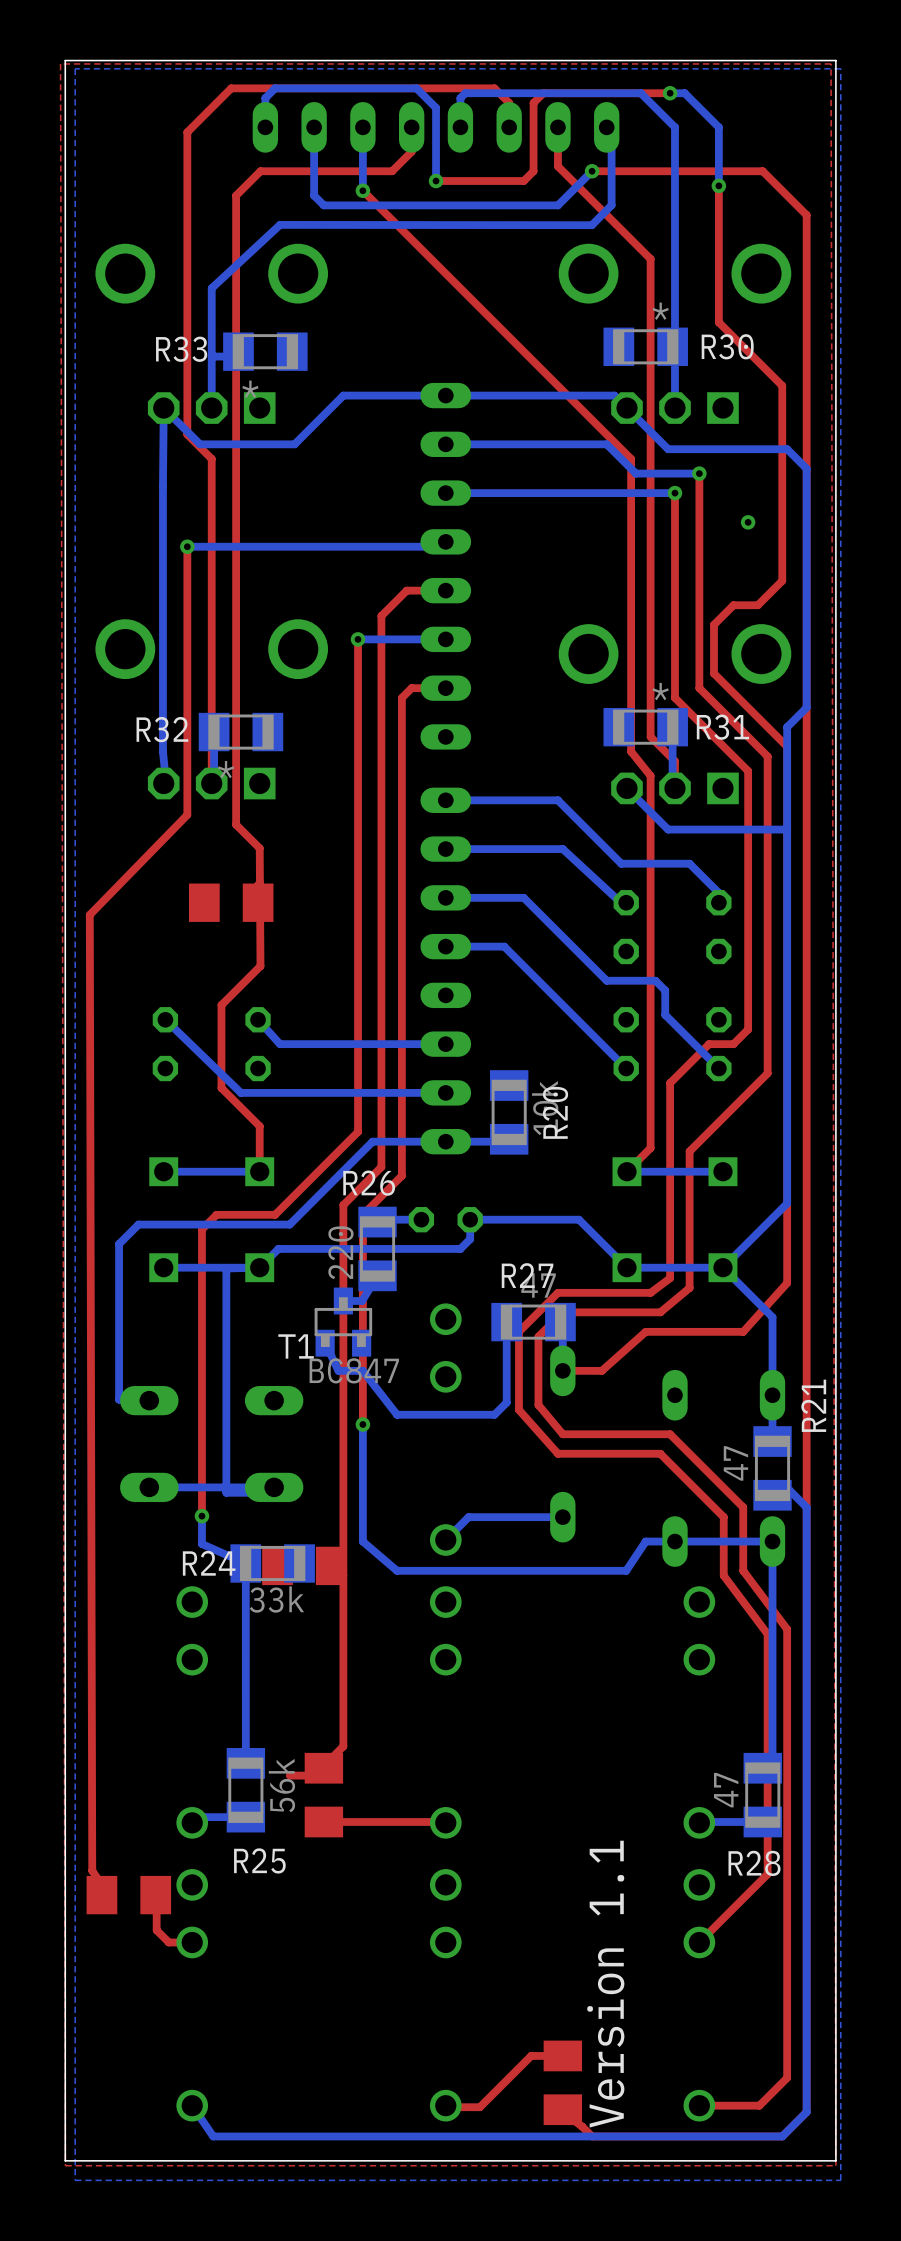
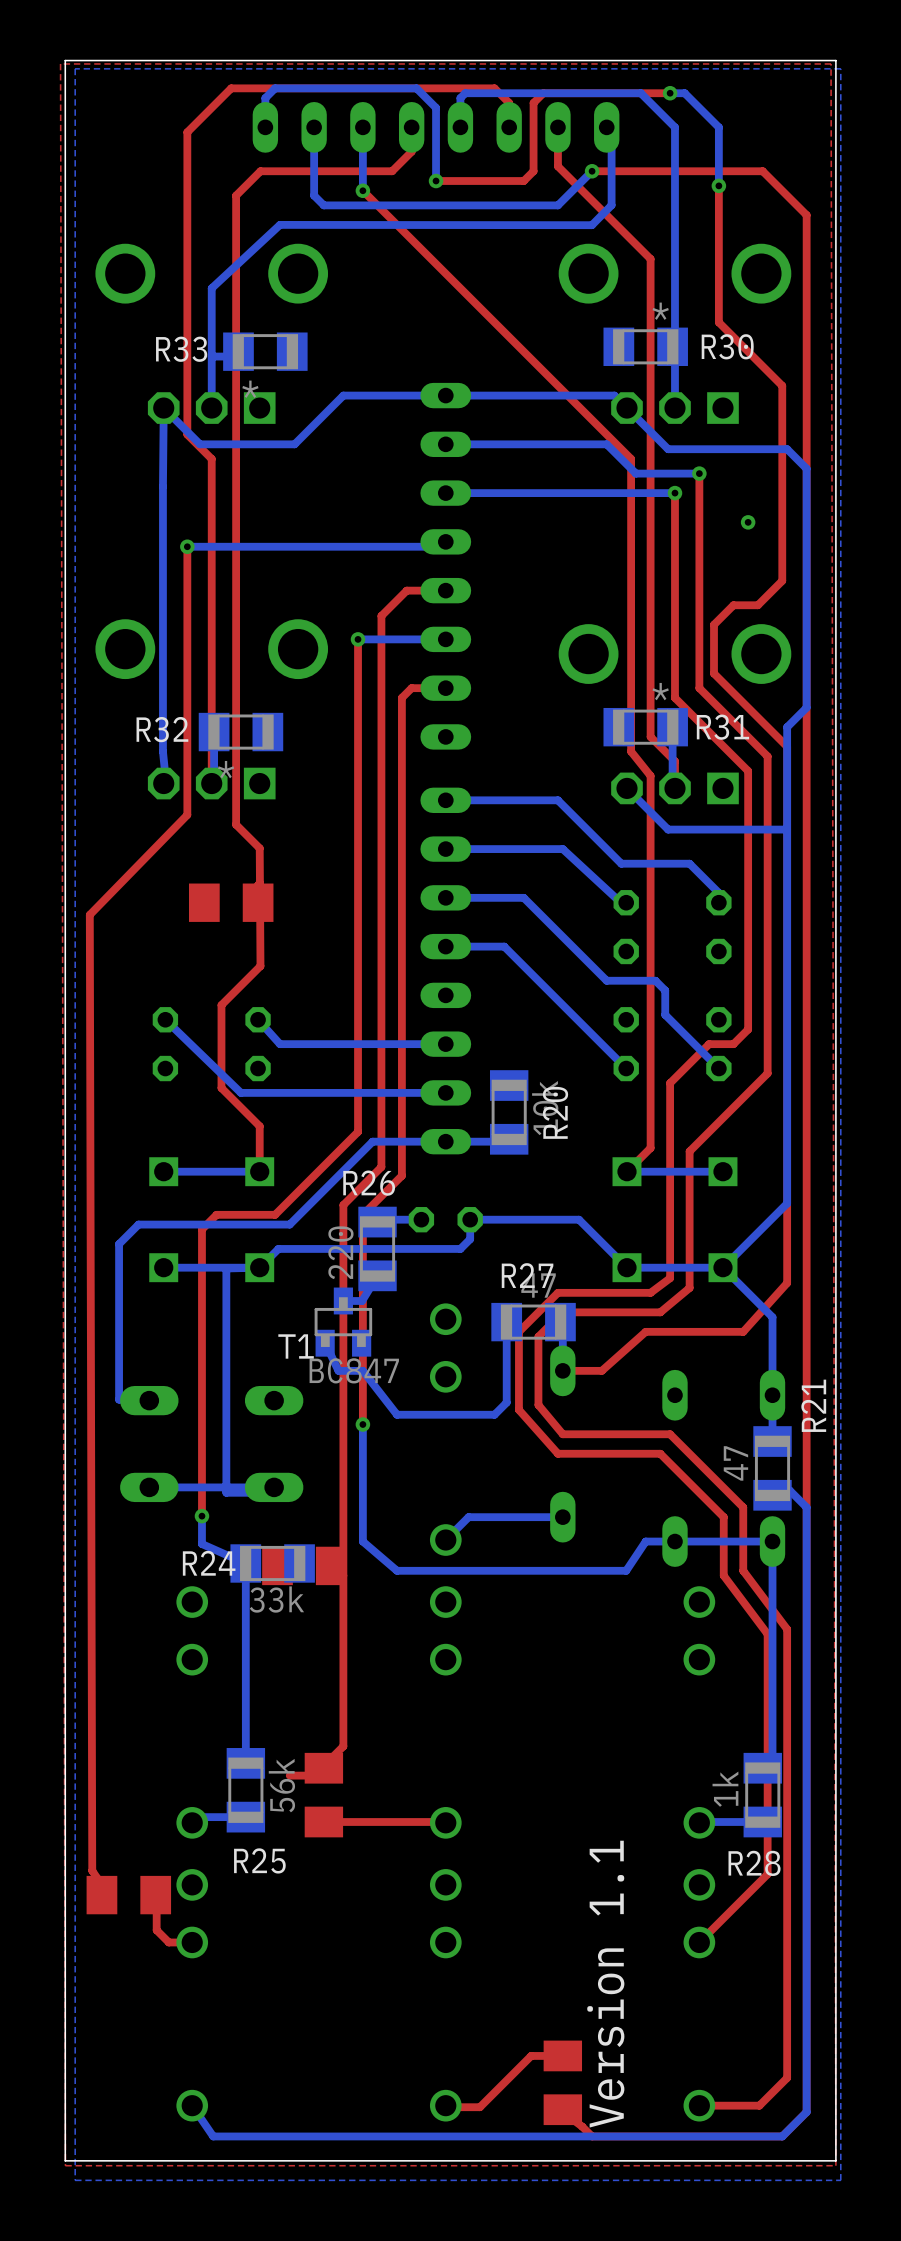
R28 value: 47 (726, 1790) -> 1k (725, 1789)

